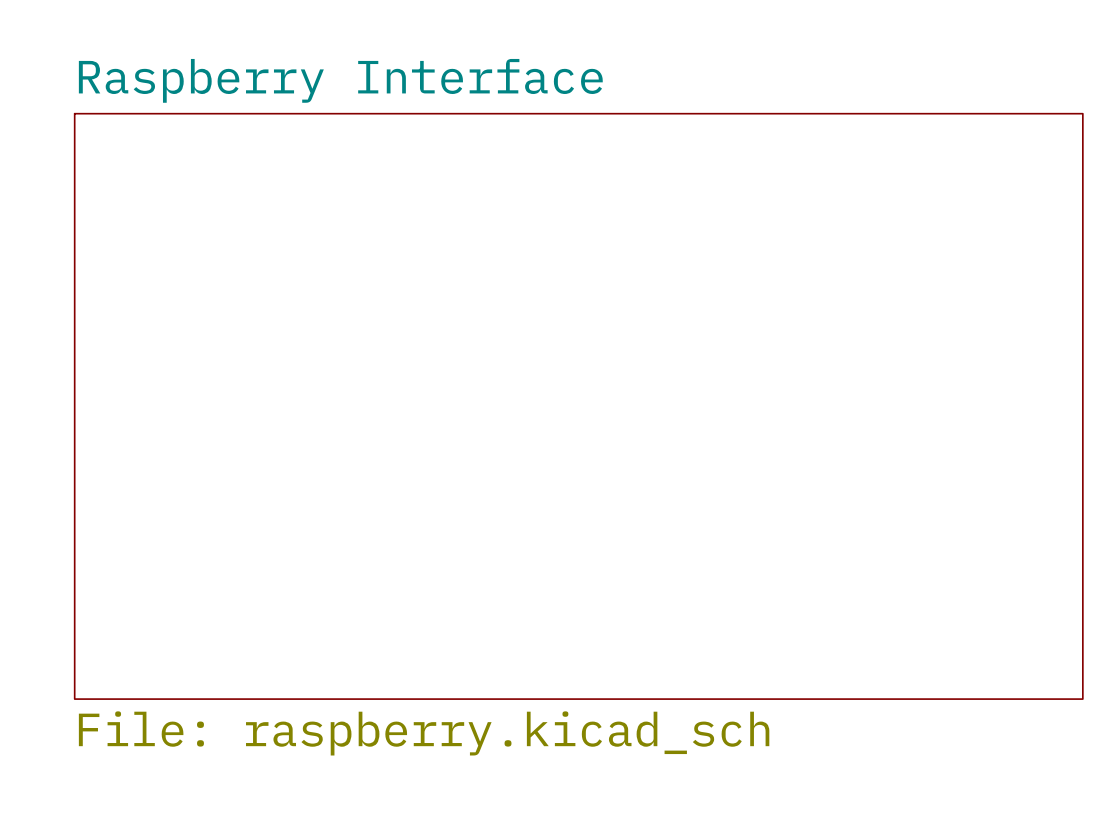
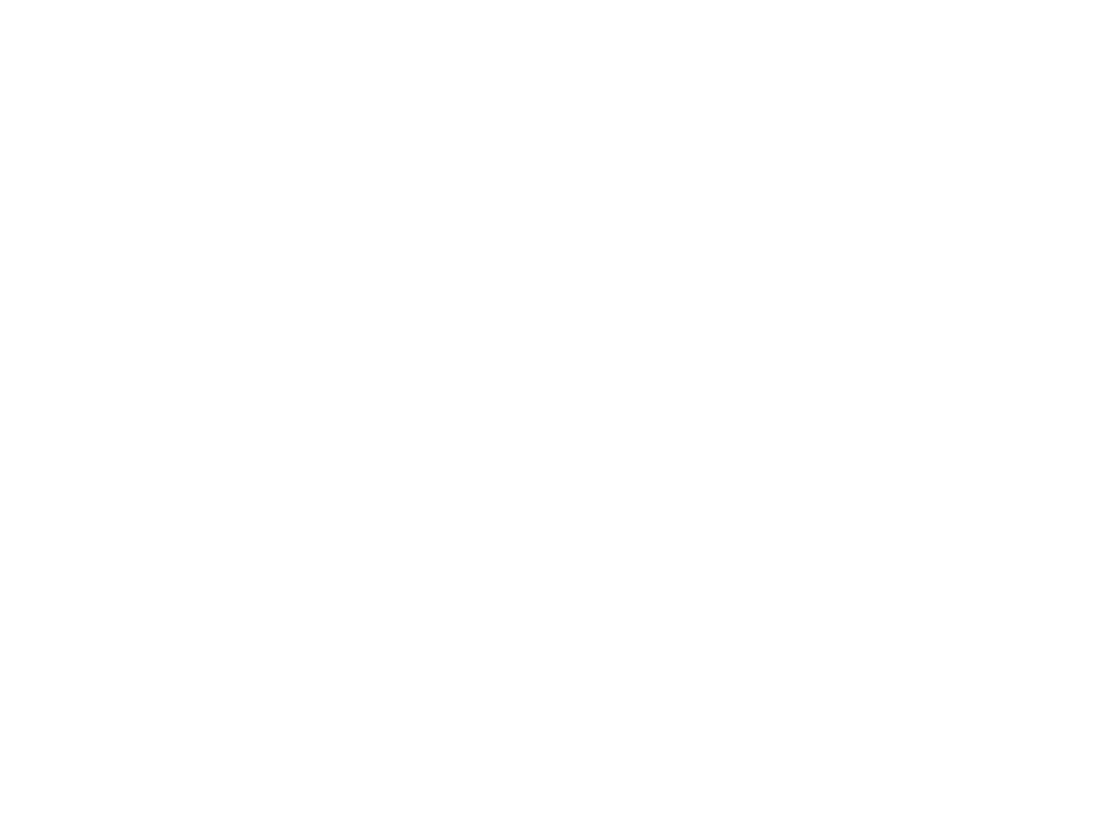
sheet Raspberry Interface: File: raspberry.kicad_sch (578, 406) -> none

